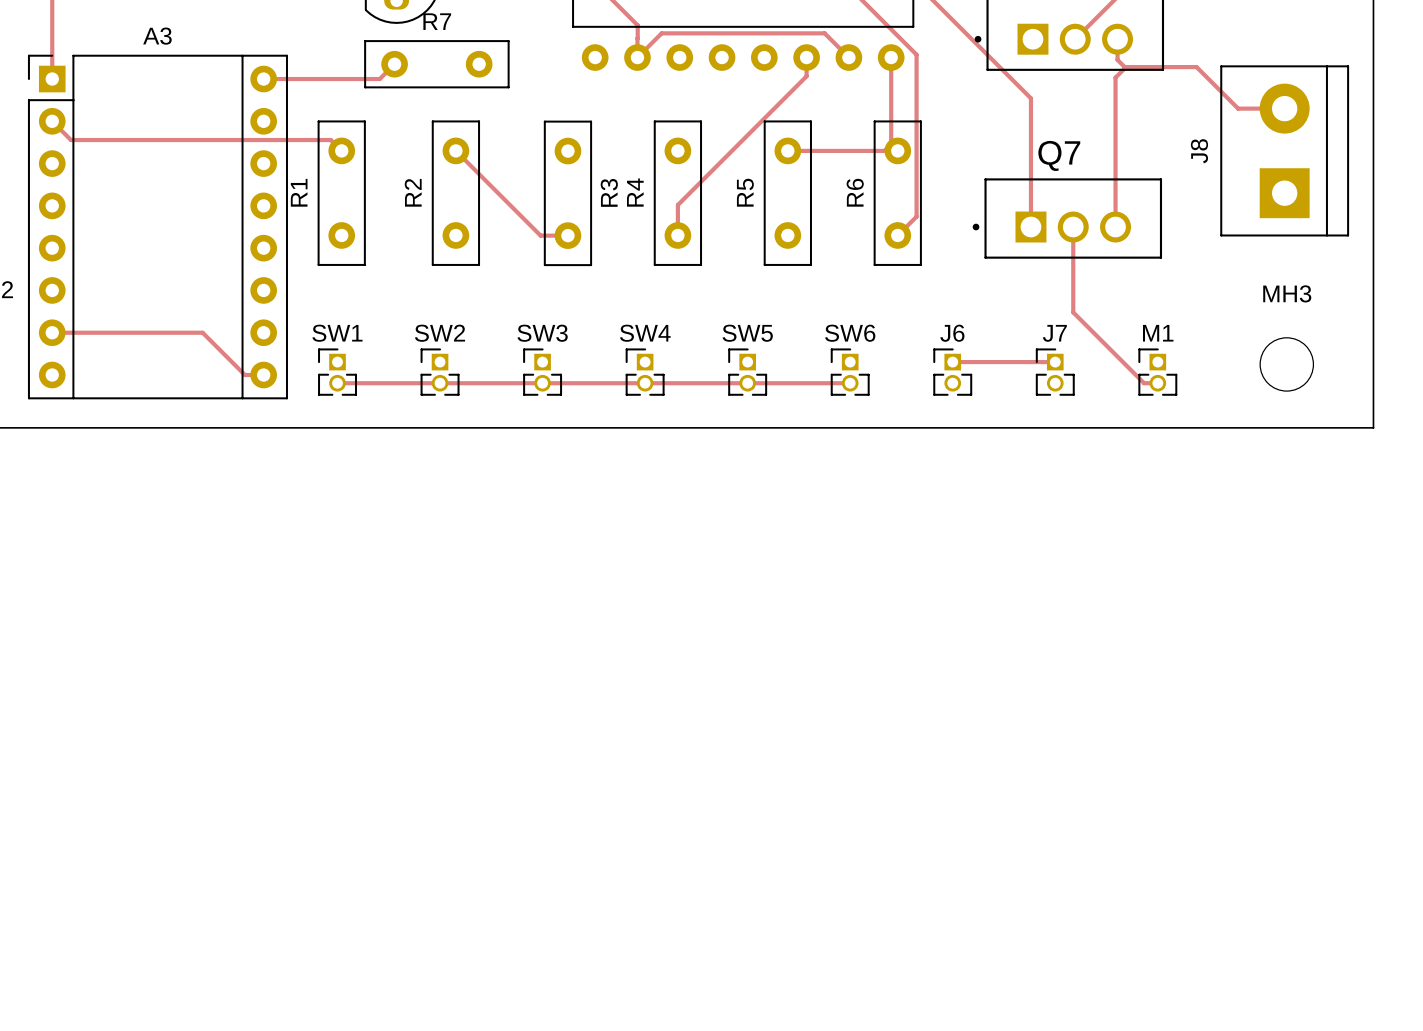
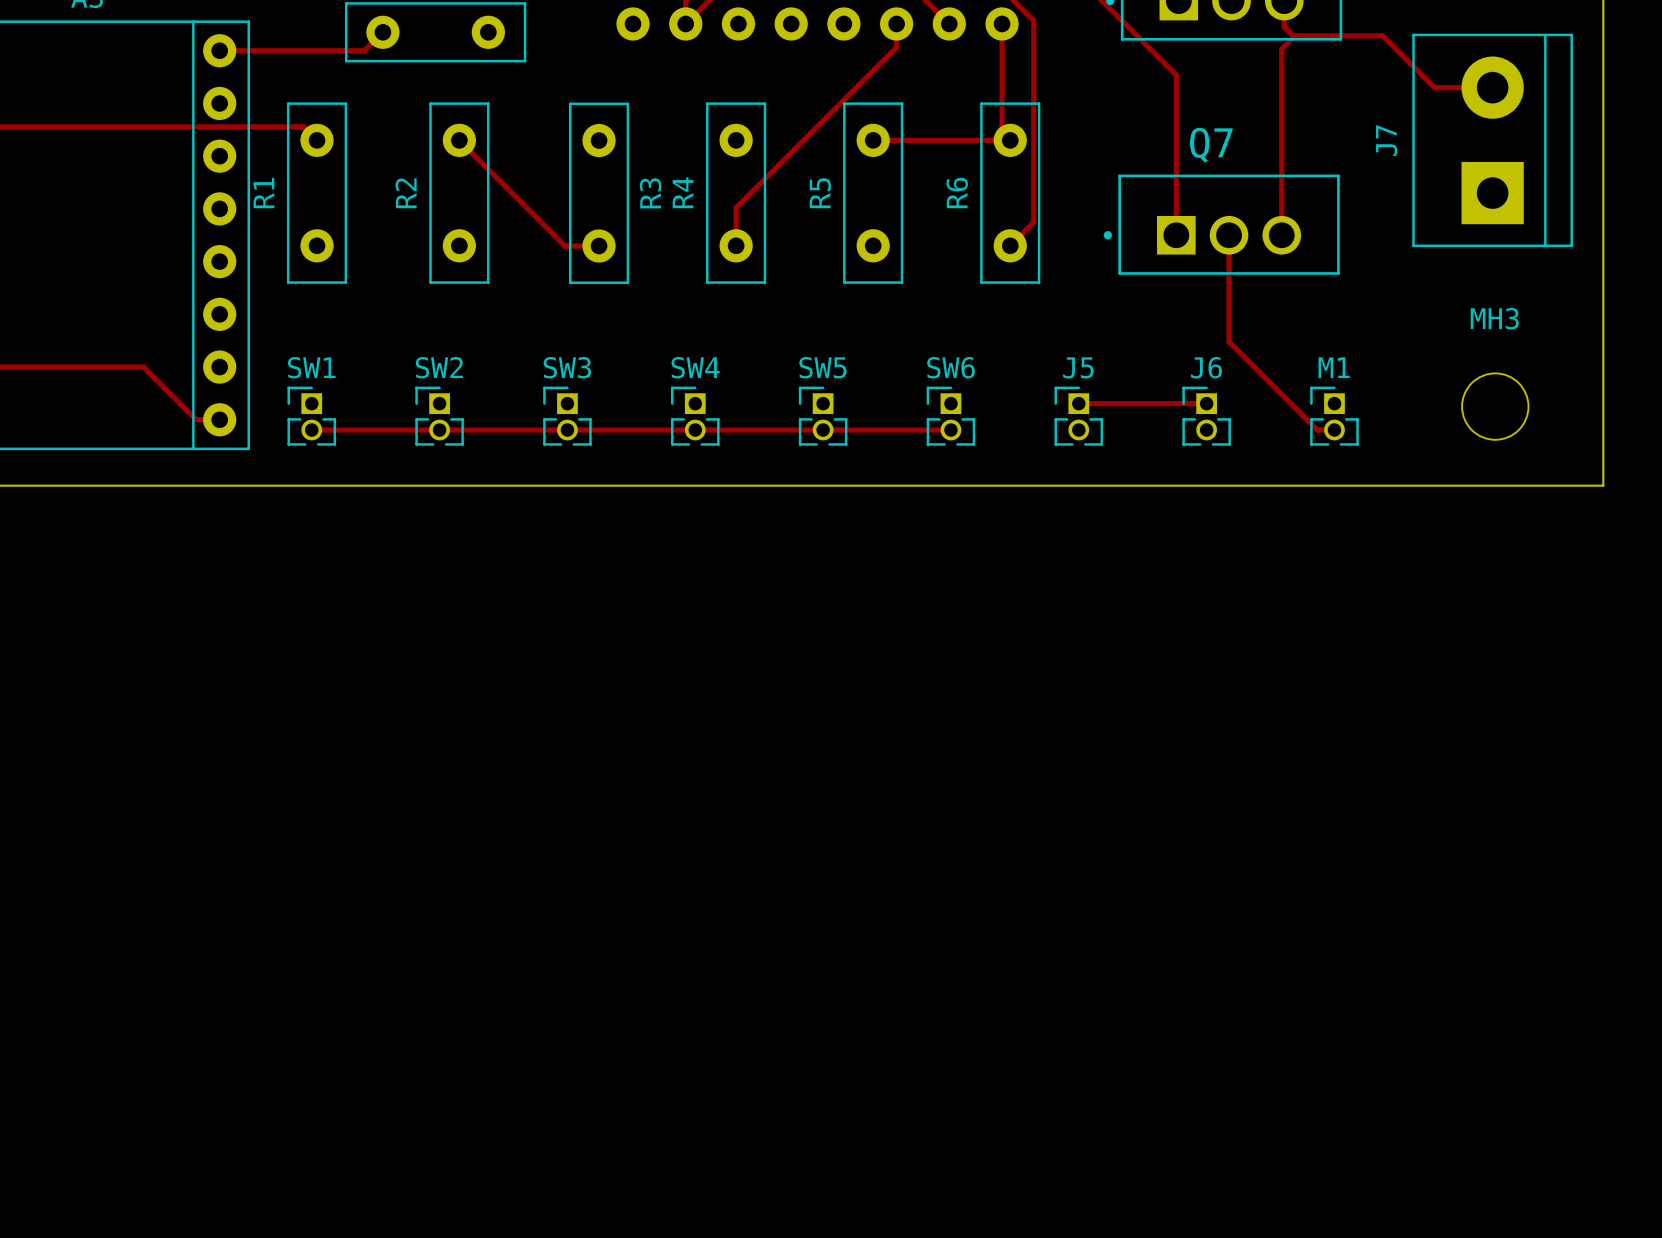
J8 name: J8 (1199, 151) -> J7 (1386, 140)
J6 name: J6 (952, 333) -> J5 (1078, 367)
J7 name: J7 (1054, 333) -> J6 (1206, 367)

